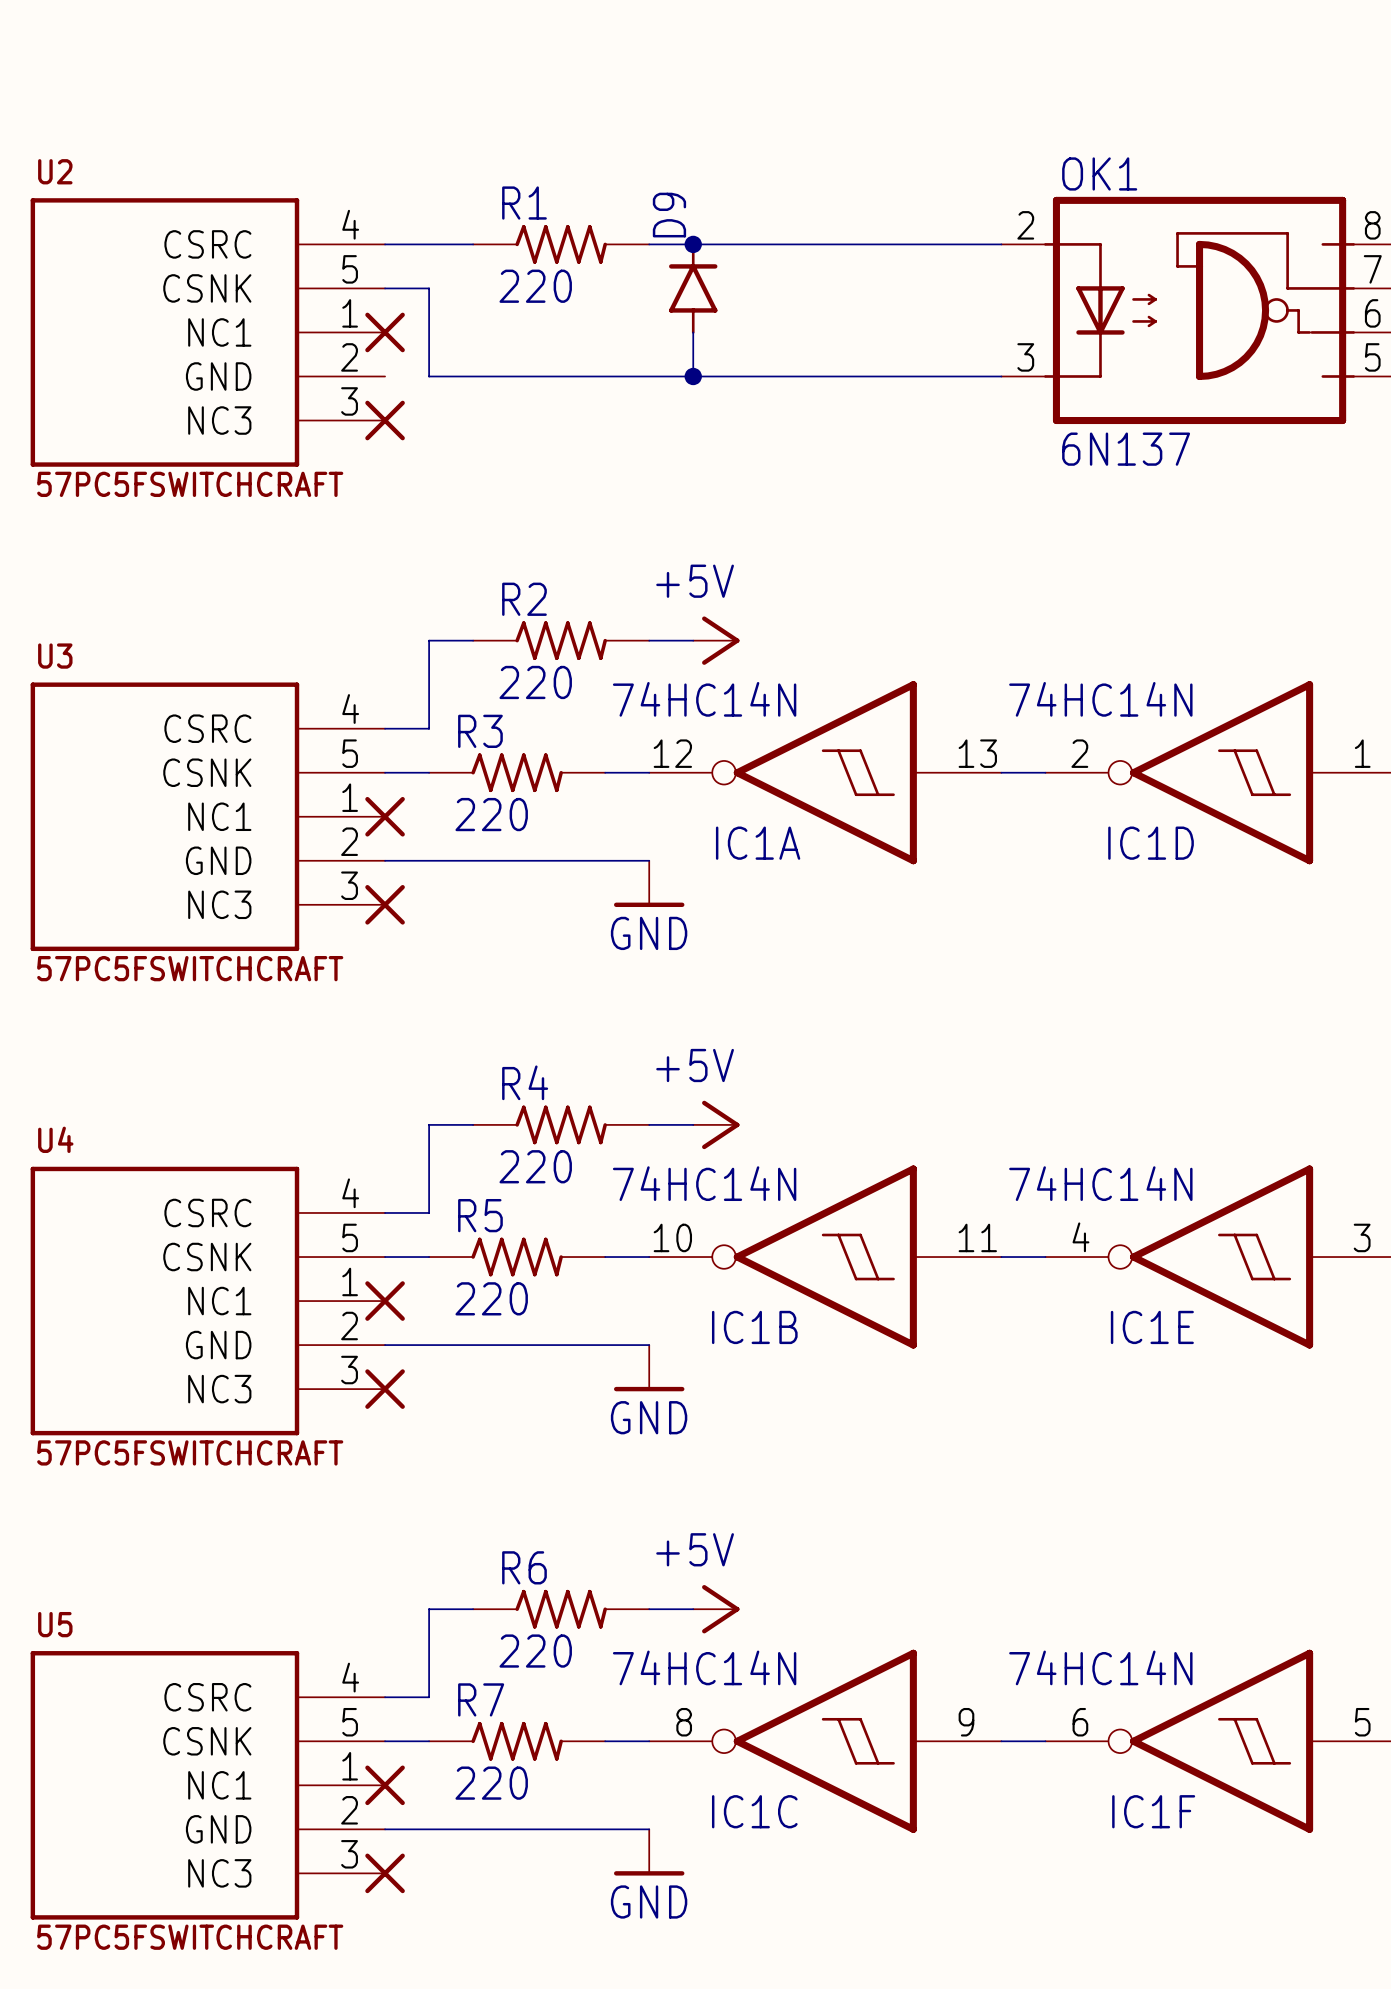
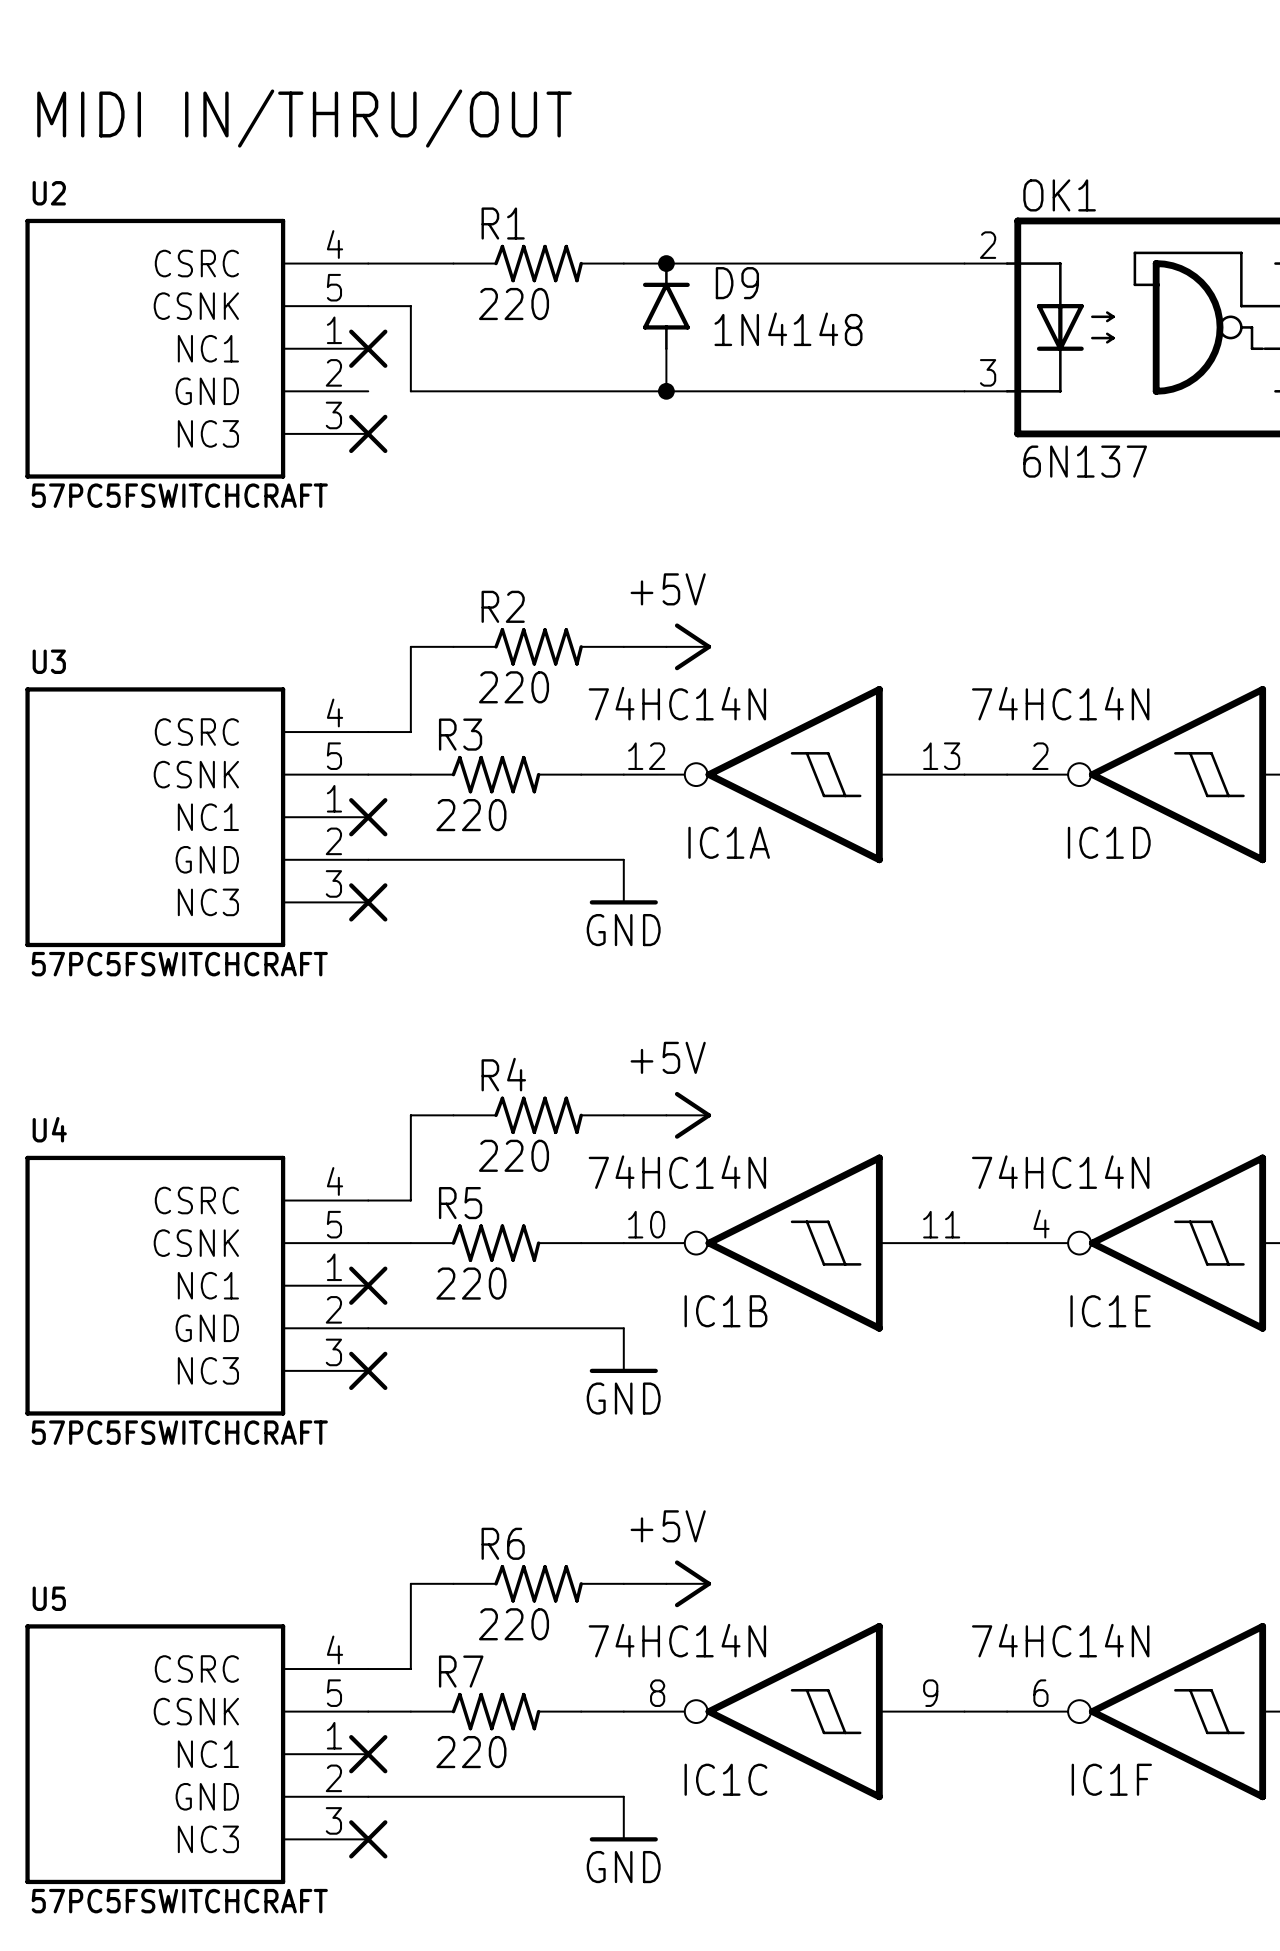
text: none -> MIDI IN/THRU/OUT (304, 118)
D9 name rotation: 0° (669, 215) -> 90° clockwise (737, 283)
D9 name position: D9 (669, 215) -> D9 (737, 283)
D9 value: none -> 1N4148 (788, 329)

